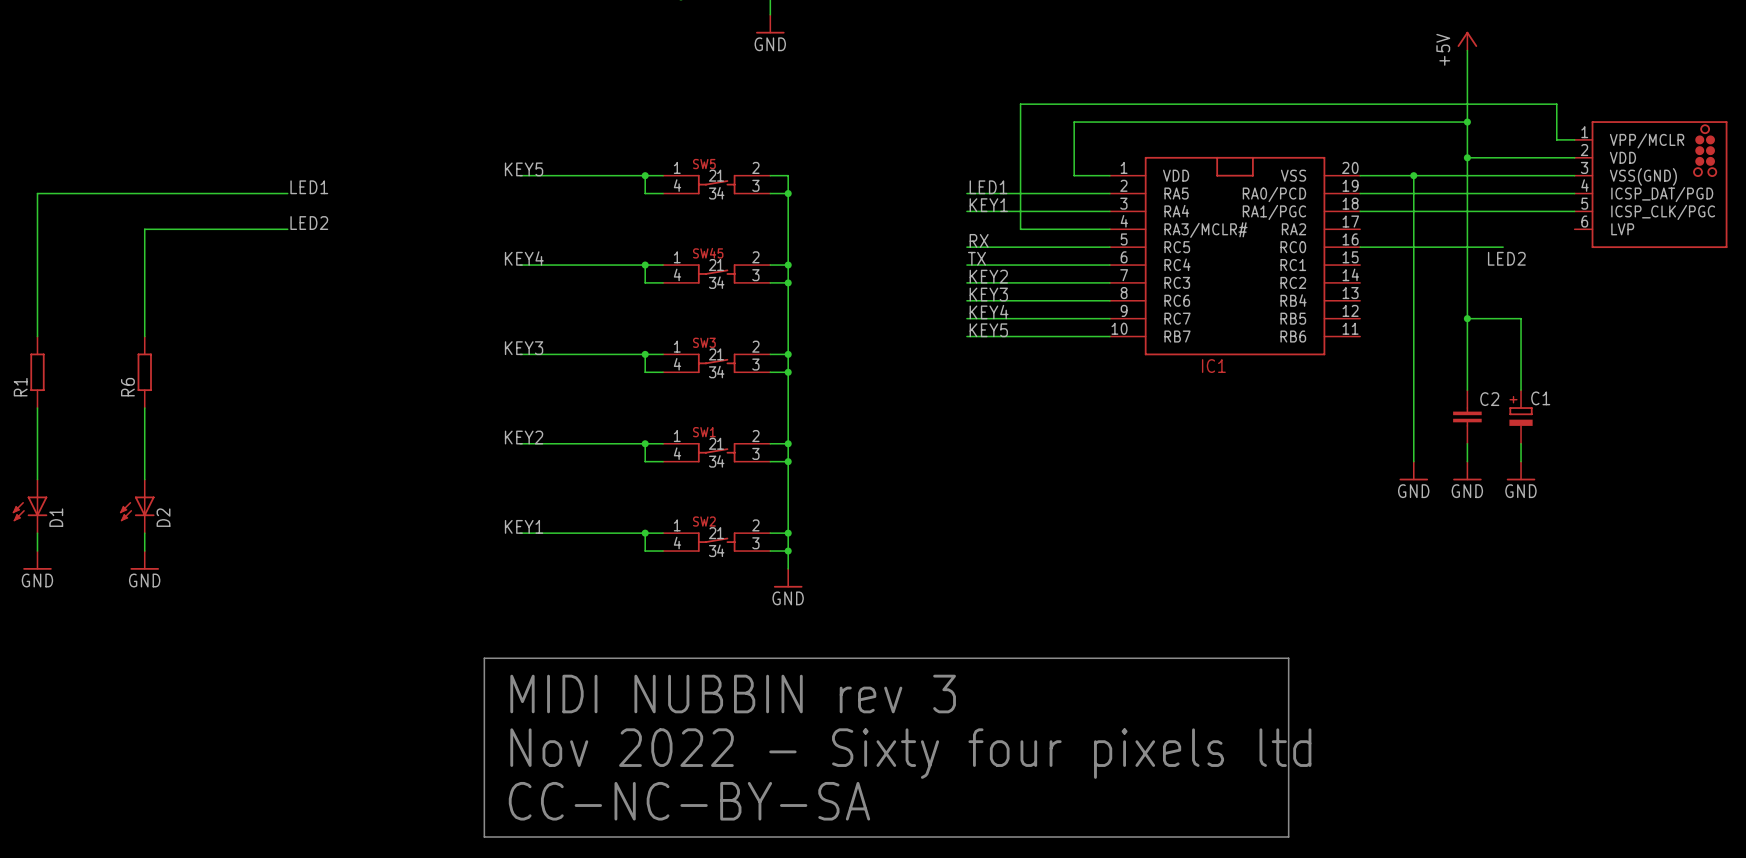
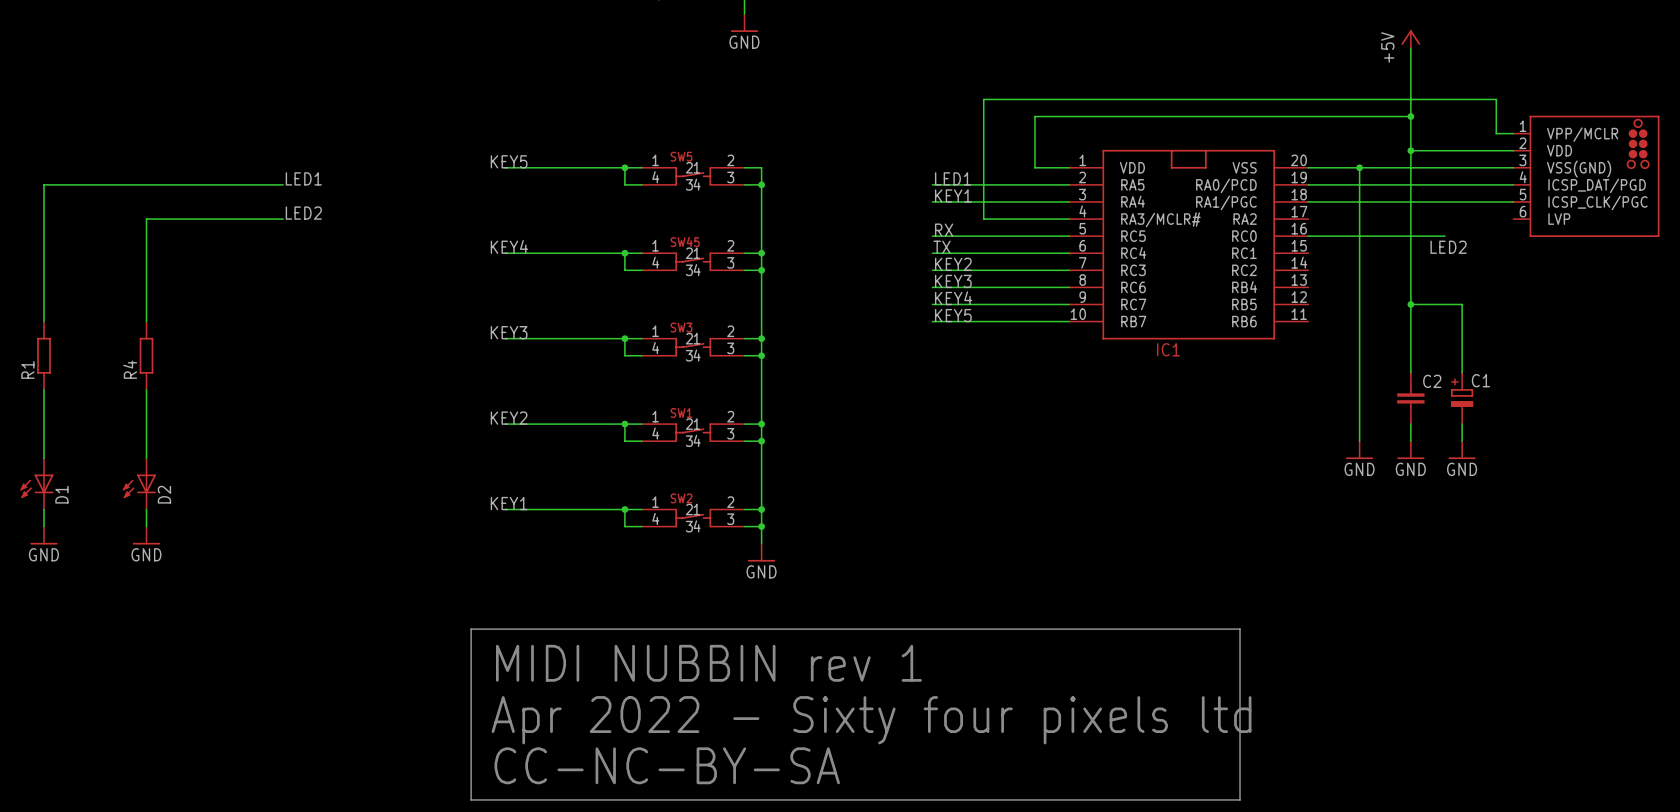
R6 name: R6 (127, 387) -> R4 (130, 369)
text: MIDI NUBBIN rev 3 (733, 694) -> MIDI NUBBIN rev 1 (708, 663)
text: Nov 2022 - Sixty four pixels ltd (910, 753) -> Apr 2022 - Sixty four pixels ltd (871, 720)

